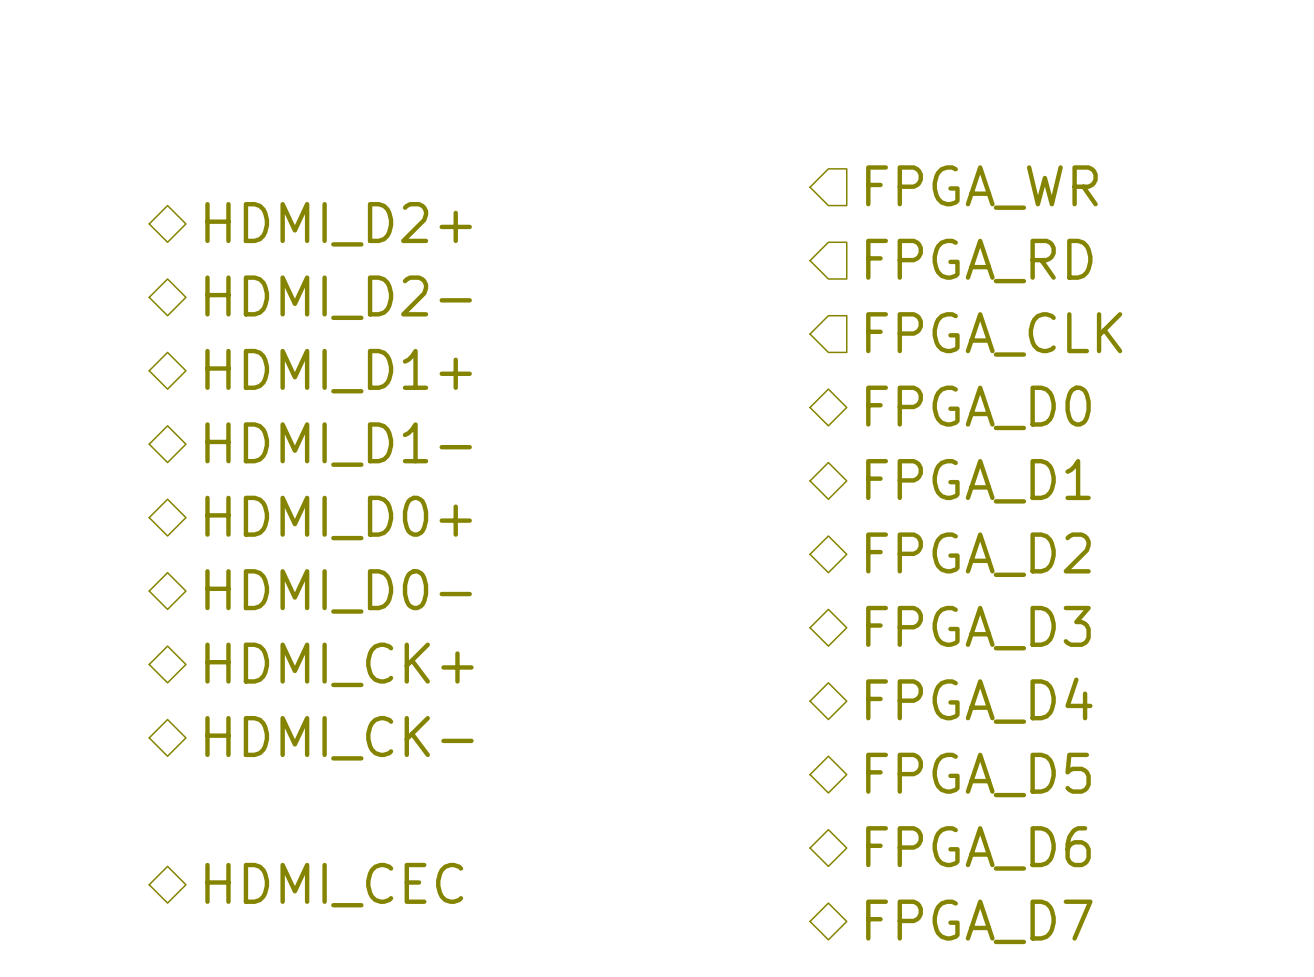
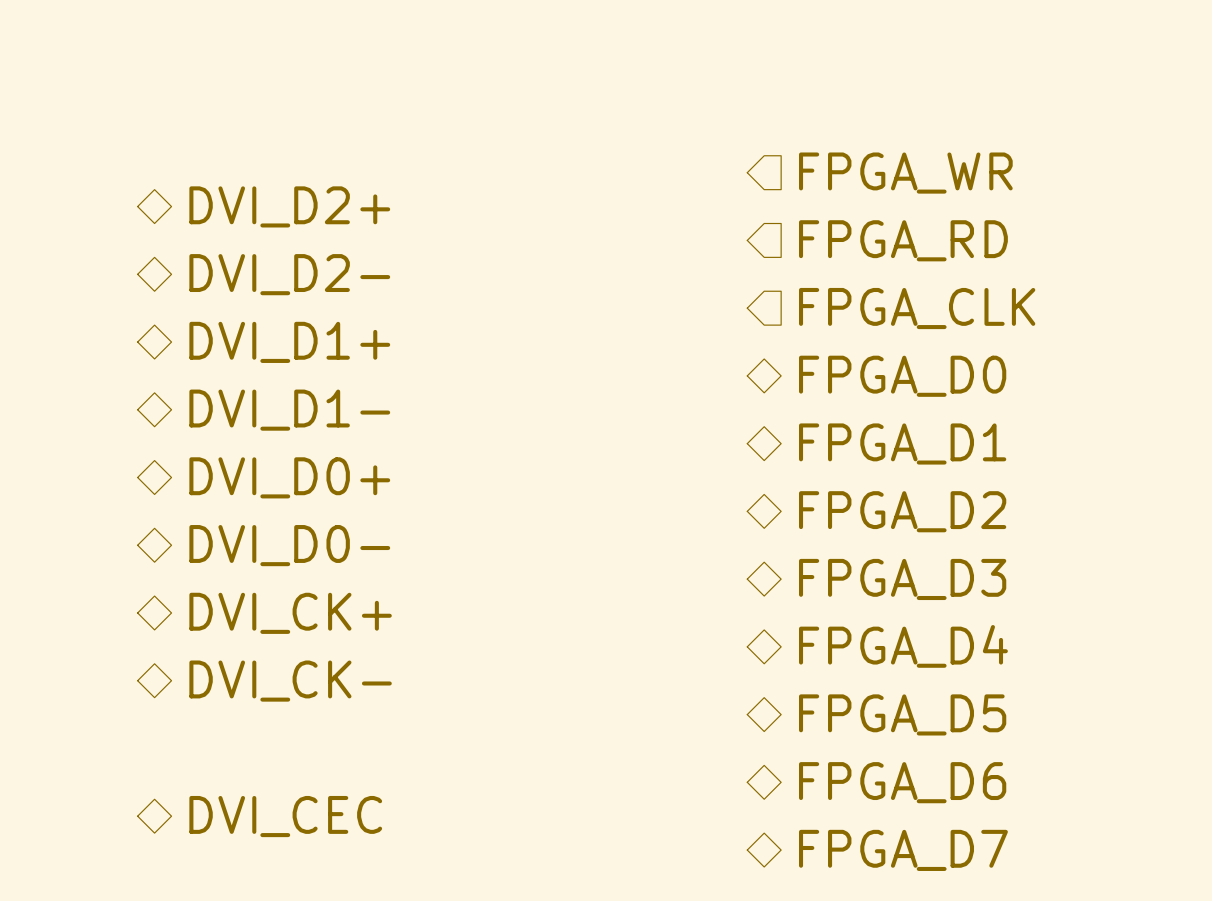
hierarchical label: HDMI_D2+ (338, 224) -> DVI_D2+ (289, 206)
hierarchical label: HDMI_D2- (338, 297) -> DVI_D2- (289, 274)
hierarchical label: HDMI_D1+ (338, 371) -> DVI_D1+ (289, 342)
hierarchical label: HDMI_D1- (338, 444) -> DVI_D1- (289, 410)
hierarchical label: HDMI_D0+ (338, 517) -> DVI_D0+ (289, 477)
hierarchical label: HDMI_D0- (338, 591) -> DVI_D0- (289, 545)
hierarchical label: HDMI_CK+ (339, 664) -> DVI_CK+ (290, 613)
hierarchical label: HDMI_CK- (339, 738) -> DVI_CK- (290, 681)
hierarchical label: HDMI_CEC (334, 885) -> DVI_CEC (285, 816)

